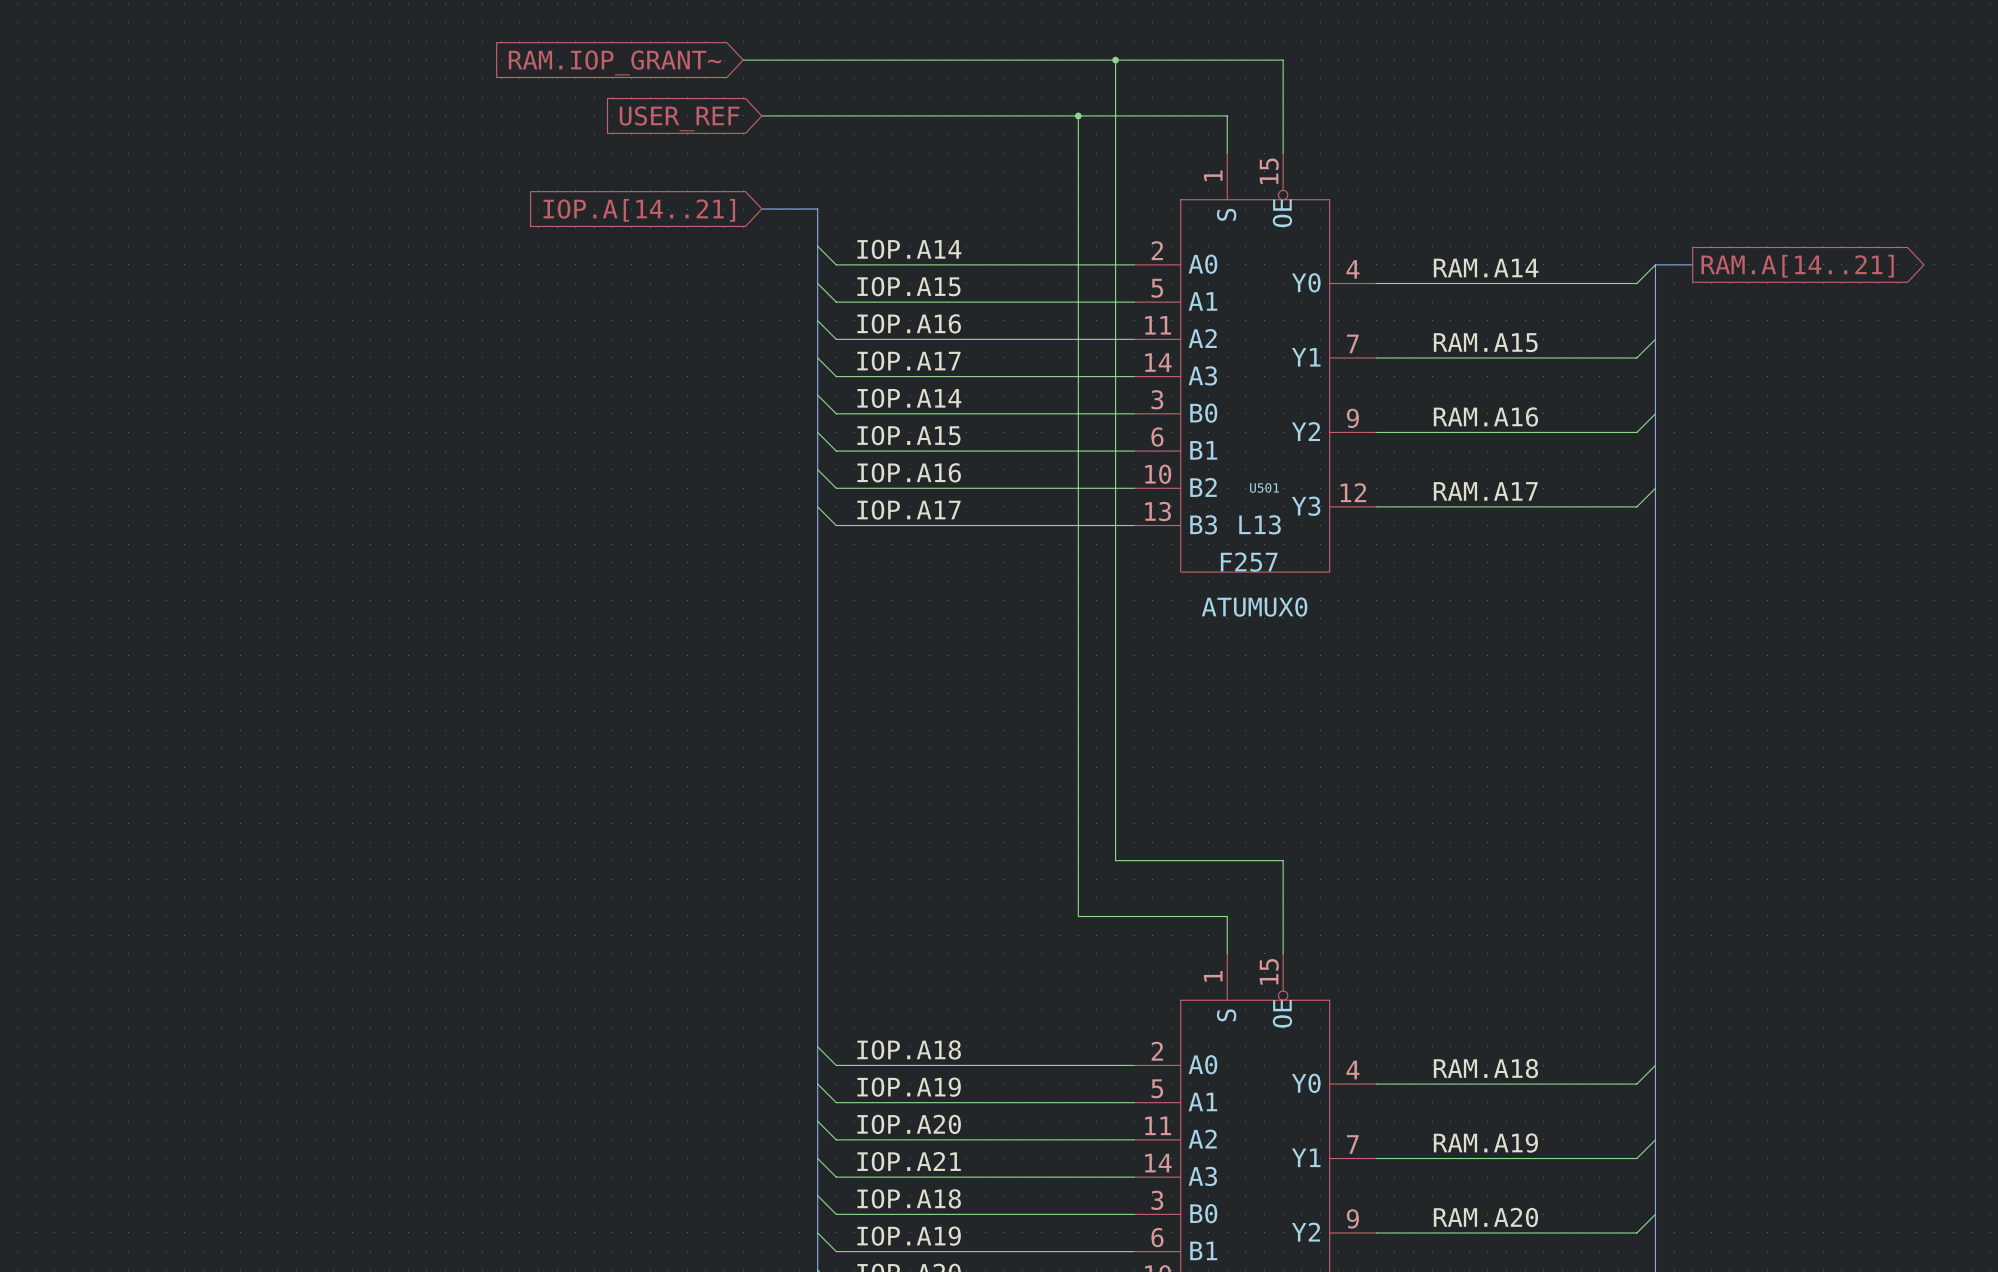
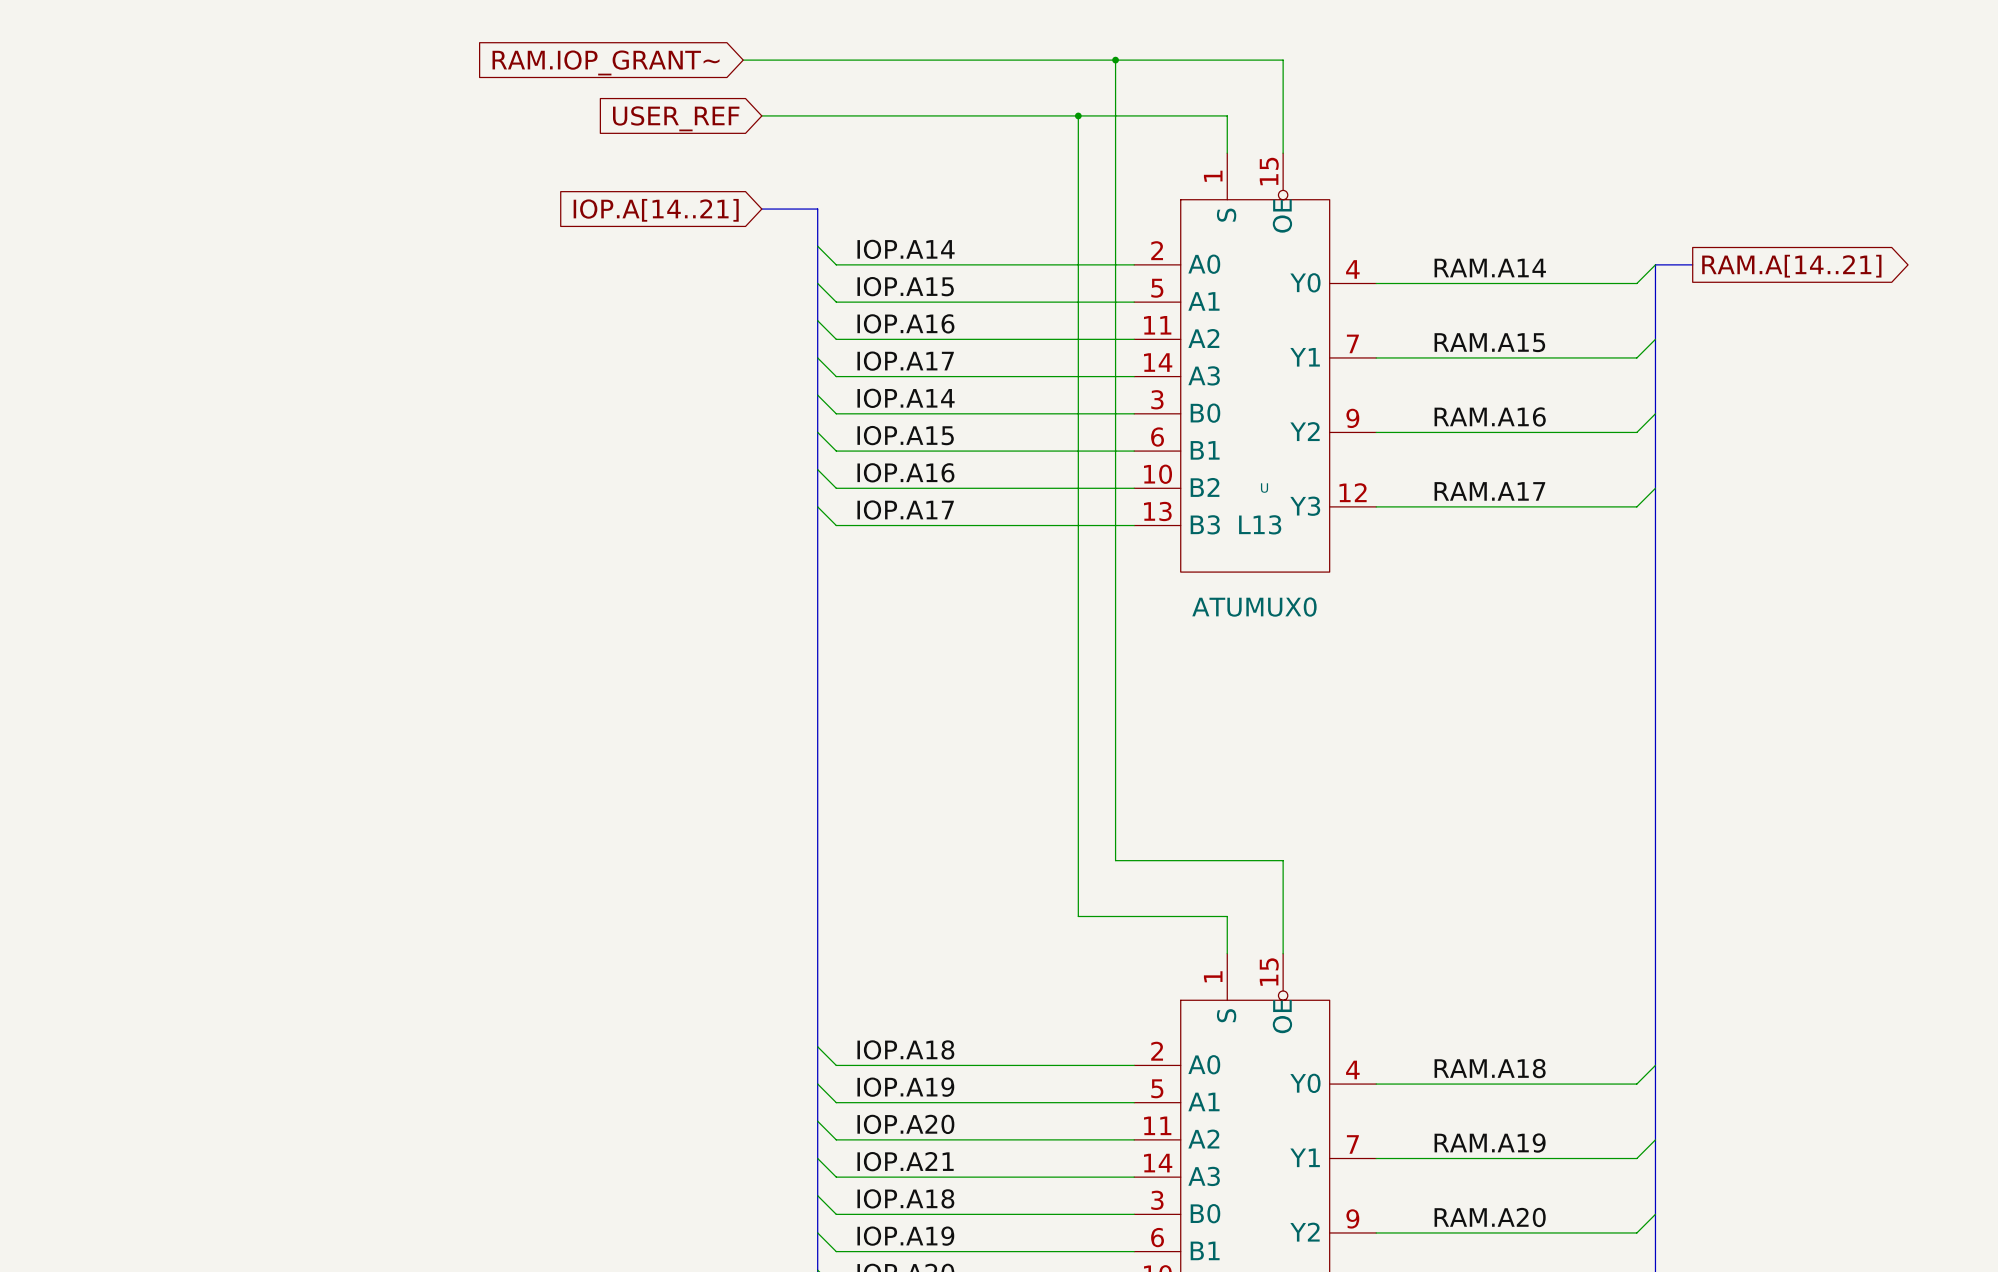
U501 name: U501 (1264, 487) -> U (1264, 488)
U501 value: F257 (1249, 562) -> none

